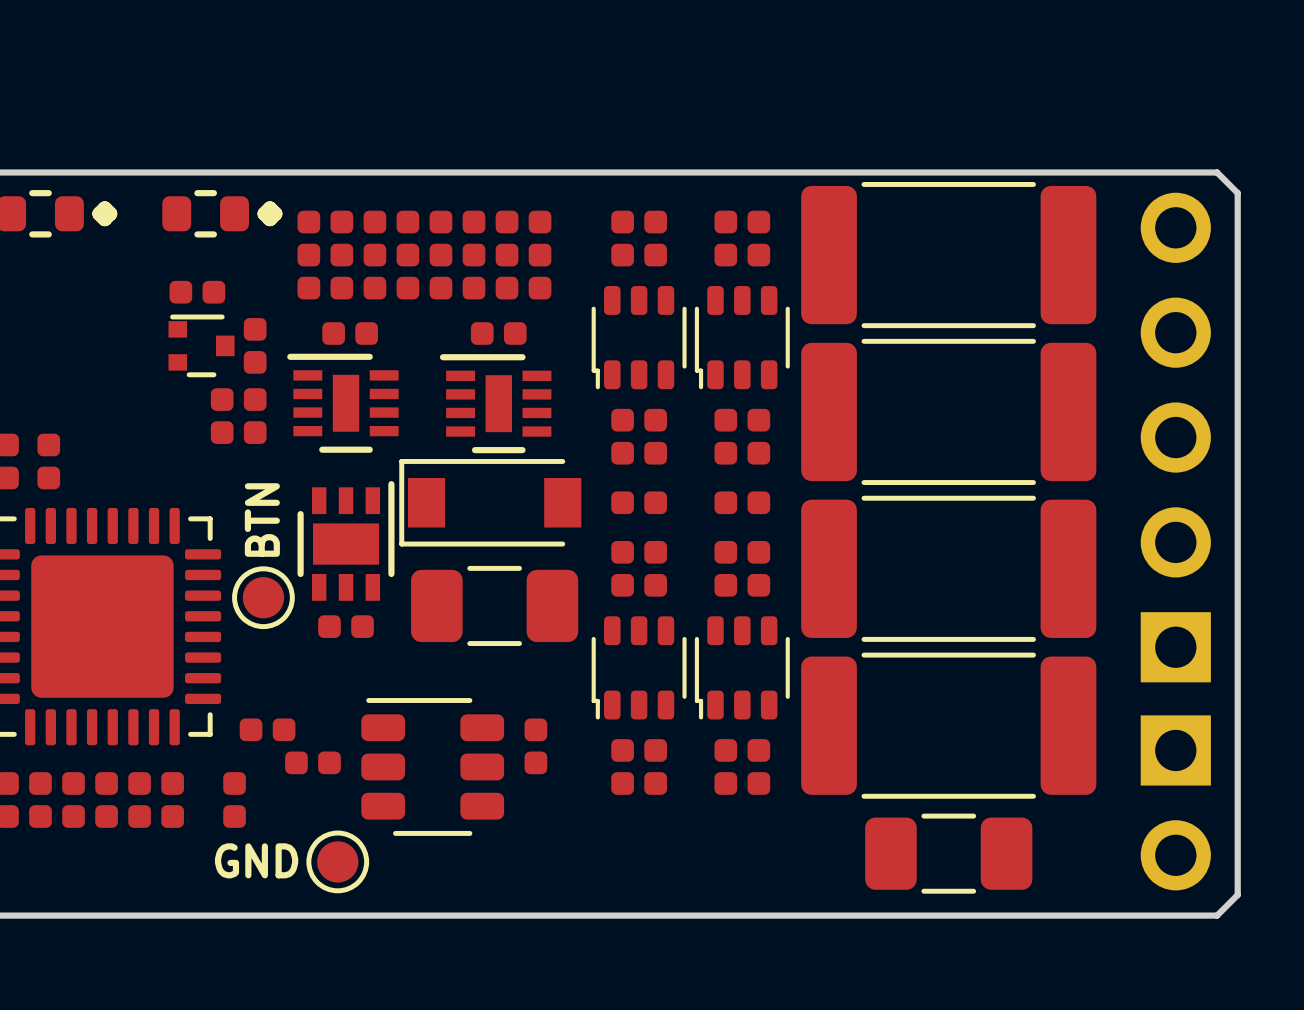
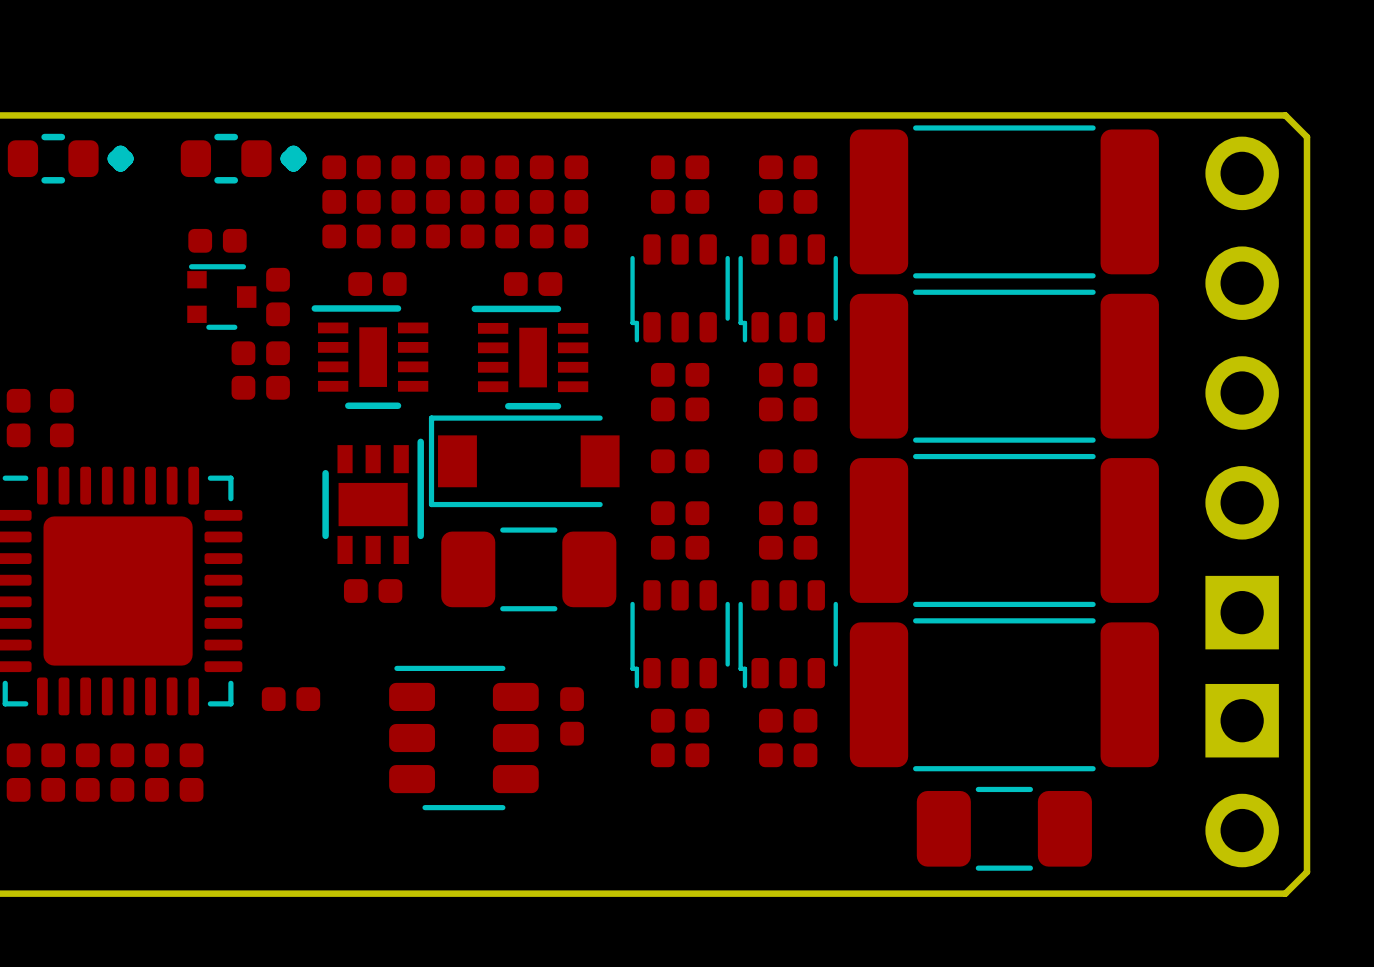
text: BTN (262, 520) -> none
part: (263, 597) -> none
part: (312, 762) -> none
part: (234, 799) -> none
text: GND (256, 860) -> none
part: (337, 861) -> none

